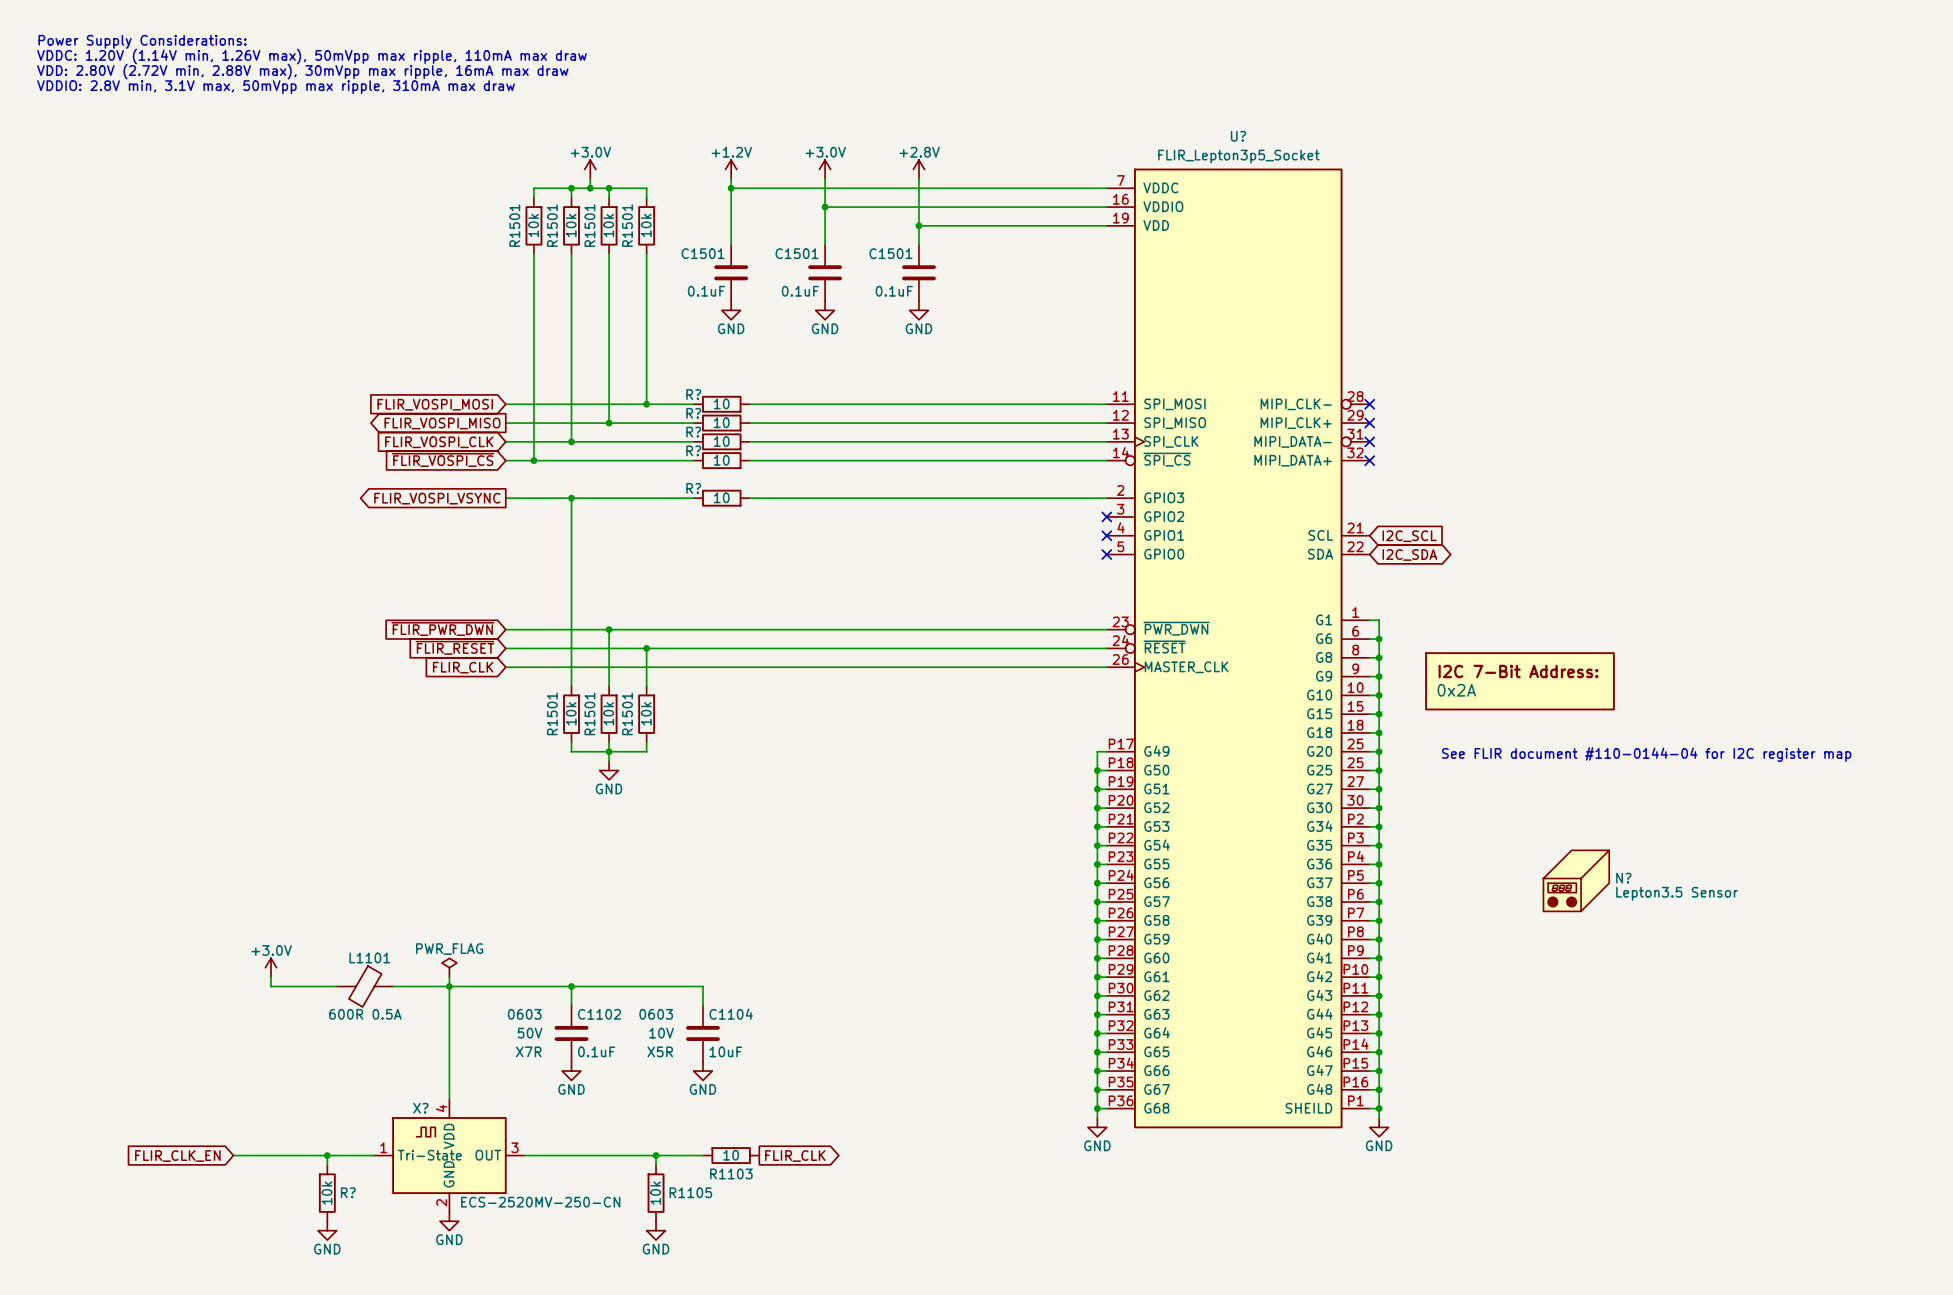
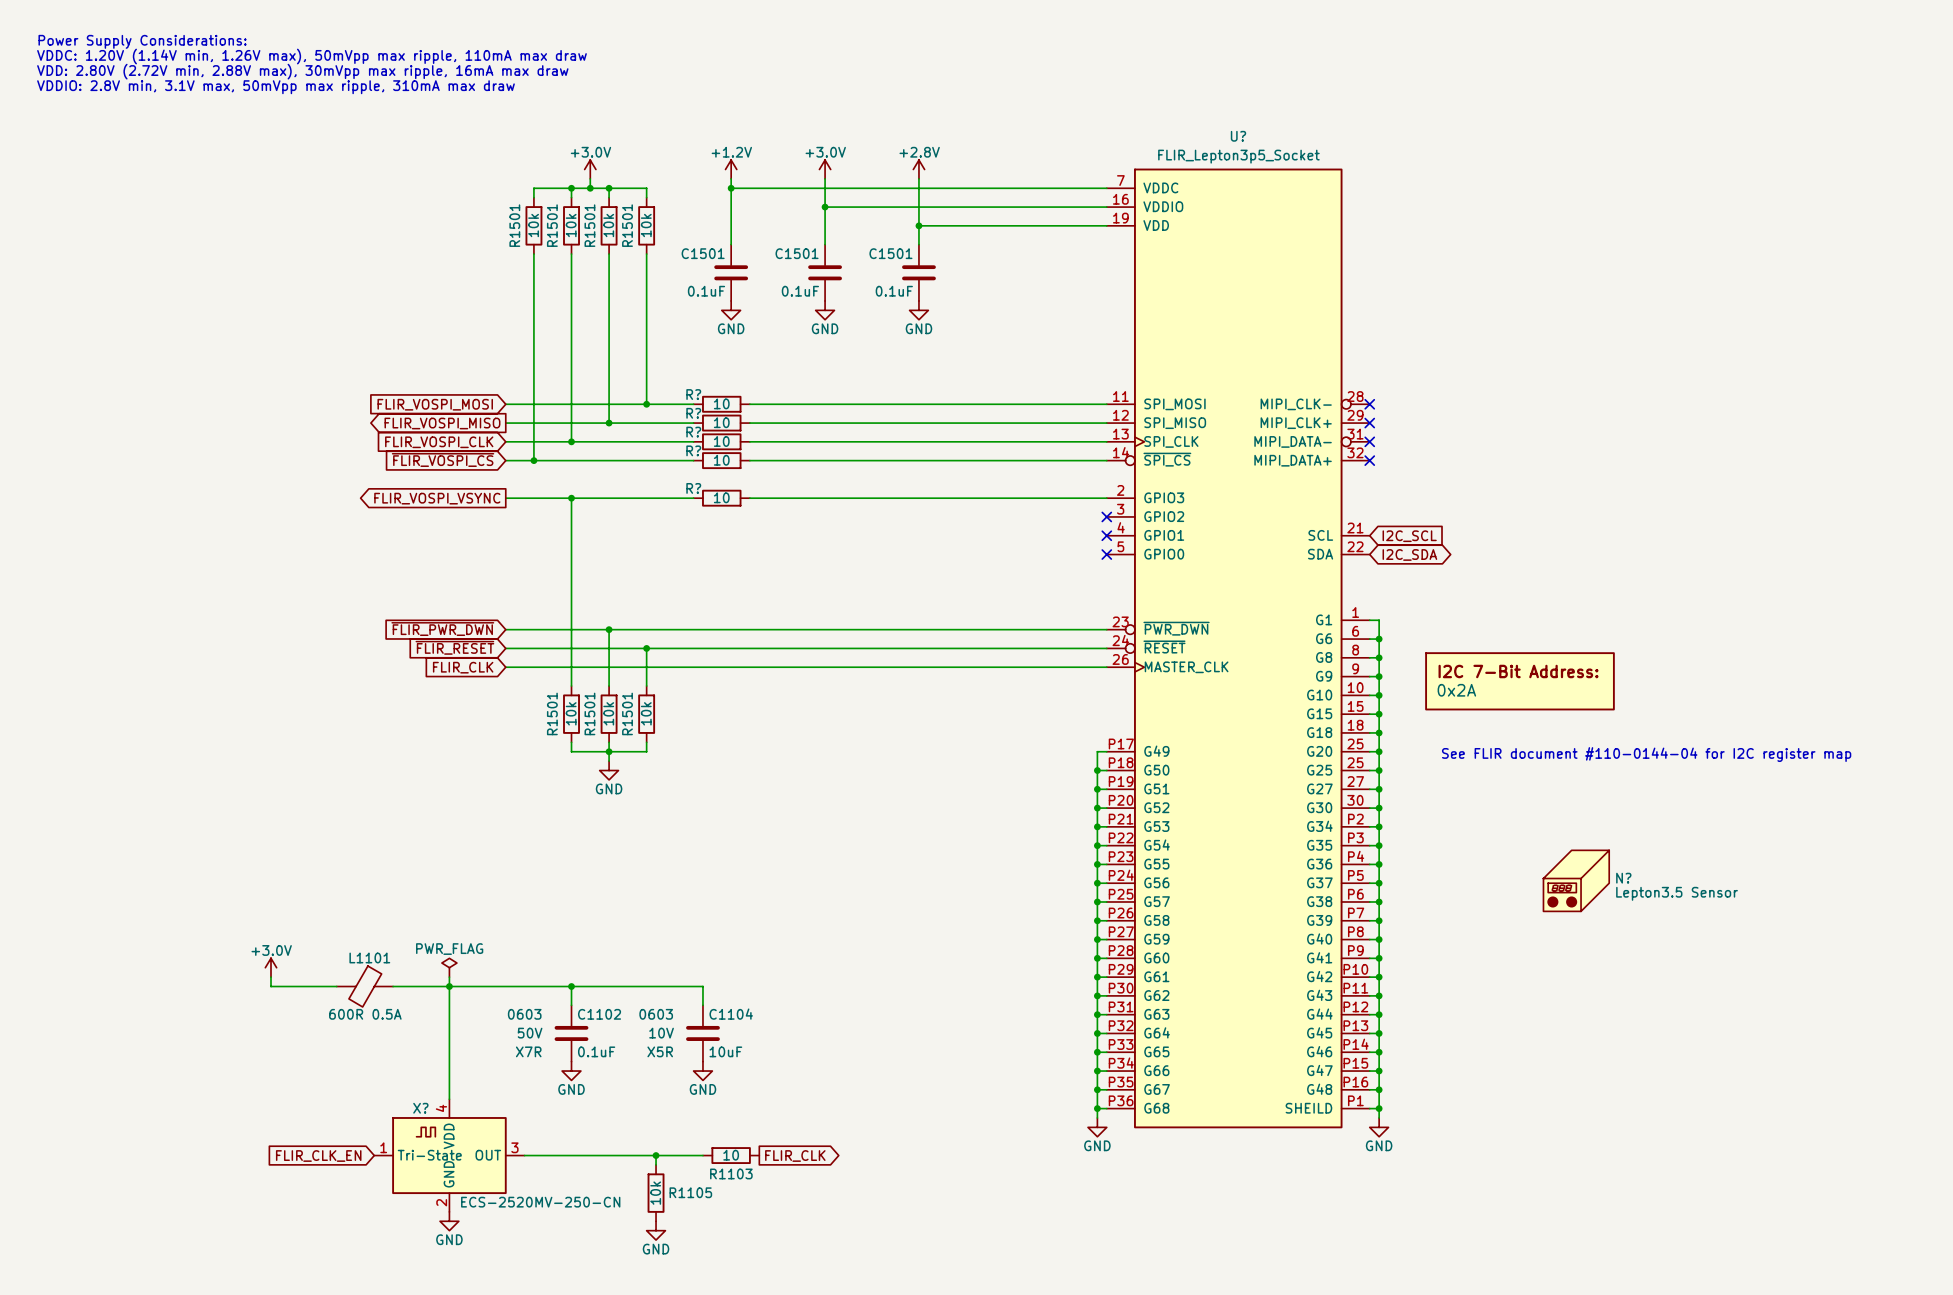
global label position: FLIR_CLK_EN (177, 1155) -> FLIR_CLK_EN (318, 1155)
wire: (233, 1155) (374, 1155) -> none
wire: (327, 1155) (327, 1164) -> none
junction: (327, 1155) -> none
R?: 10k (327, 1193) -> none
power symbol: GND (327, 1230) -> none

